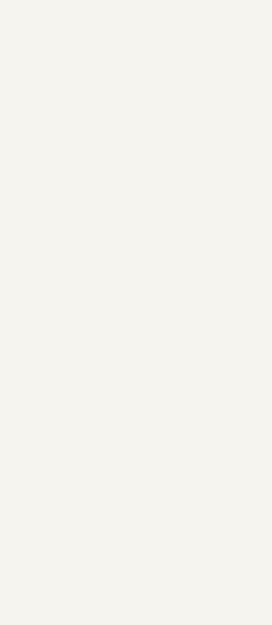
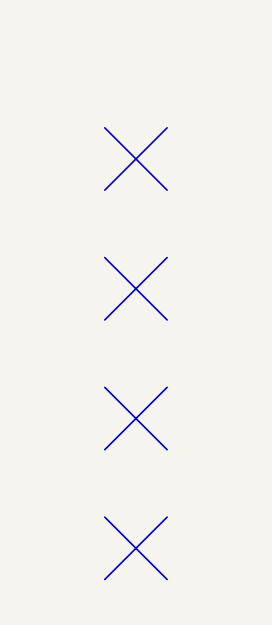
no-connect mark: none -> (135, 158)
no-connect mark: none -> (135, 288)
no-connect mark: none -> (135, 418)
no-connect mark: none -> (135, 548)

